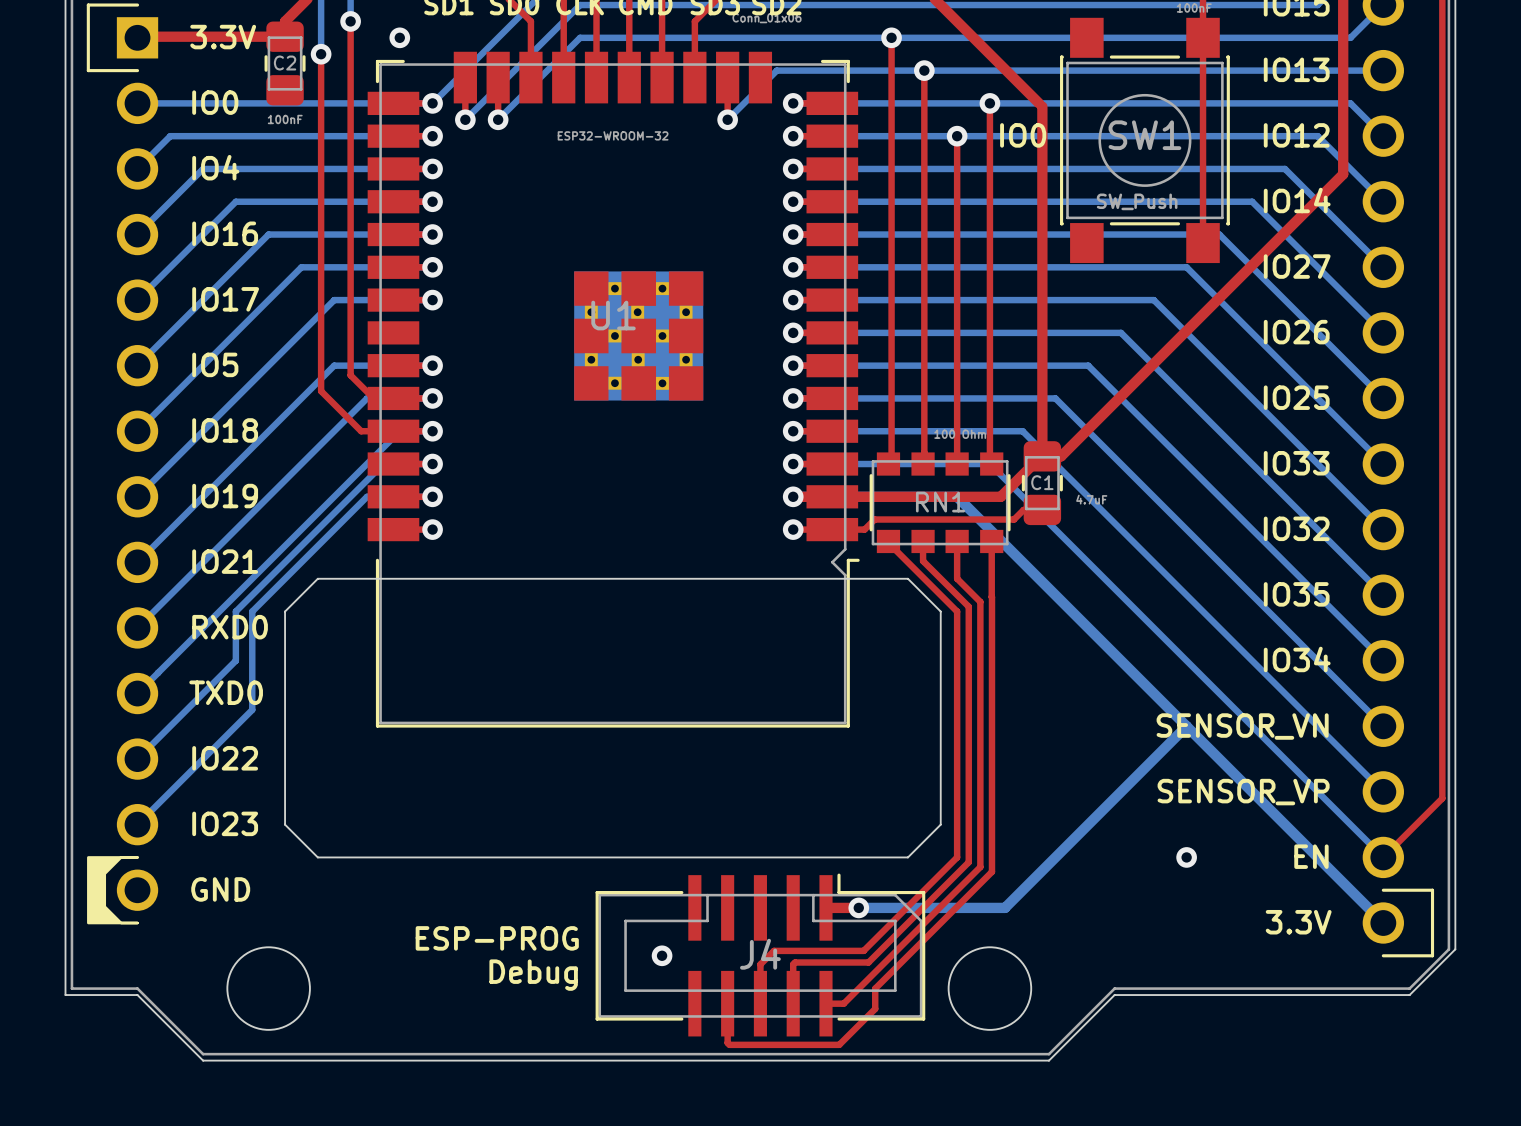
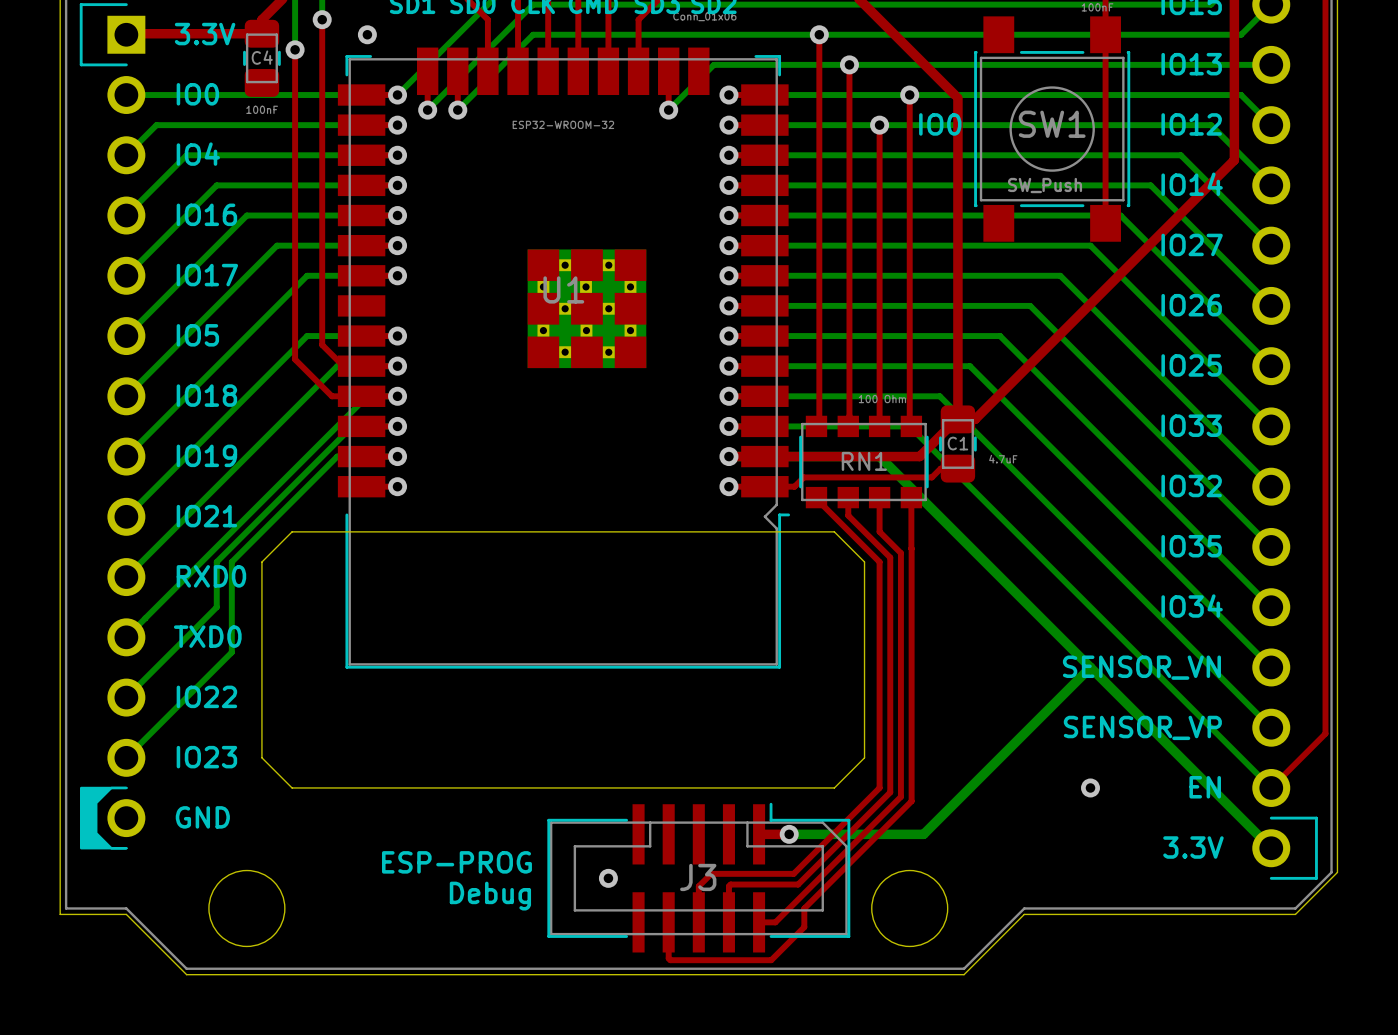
C2 name: C2 (285, 63) -> C4 (262, 57)
J4 name: J4 (760, 954) -> J3 (698, 877)

